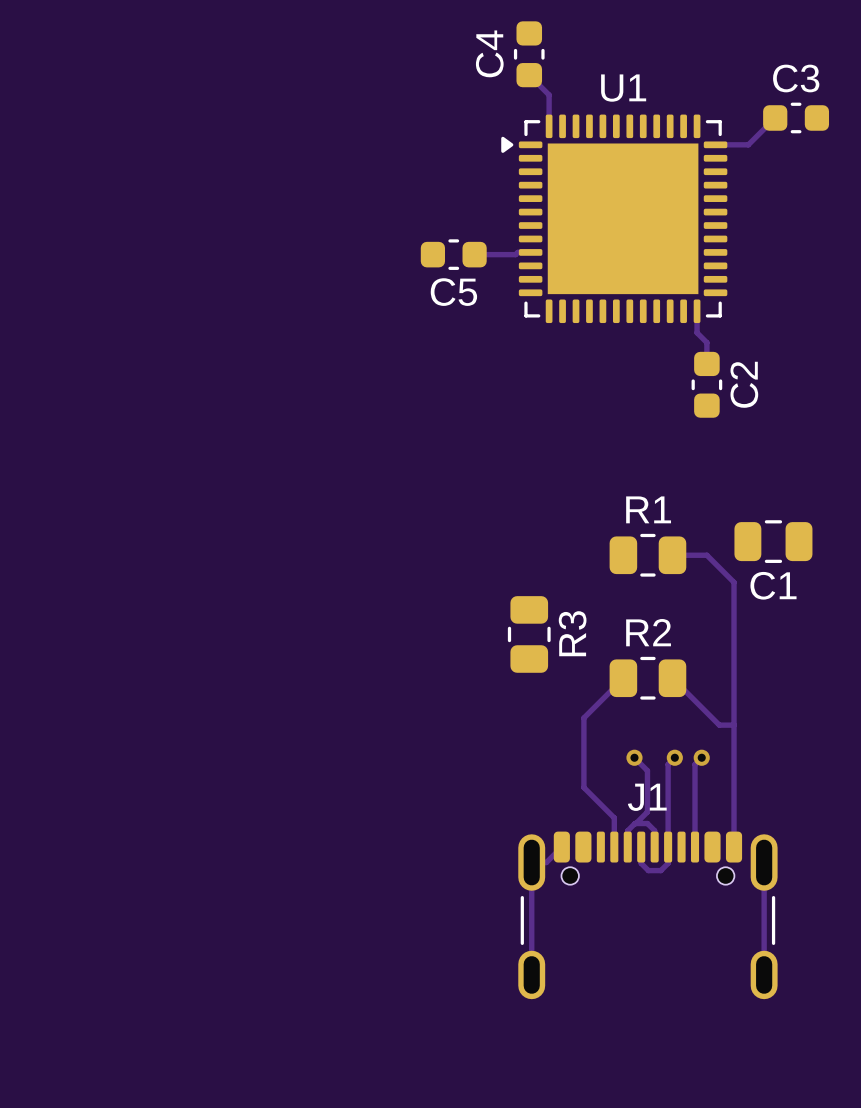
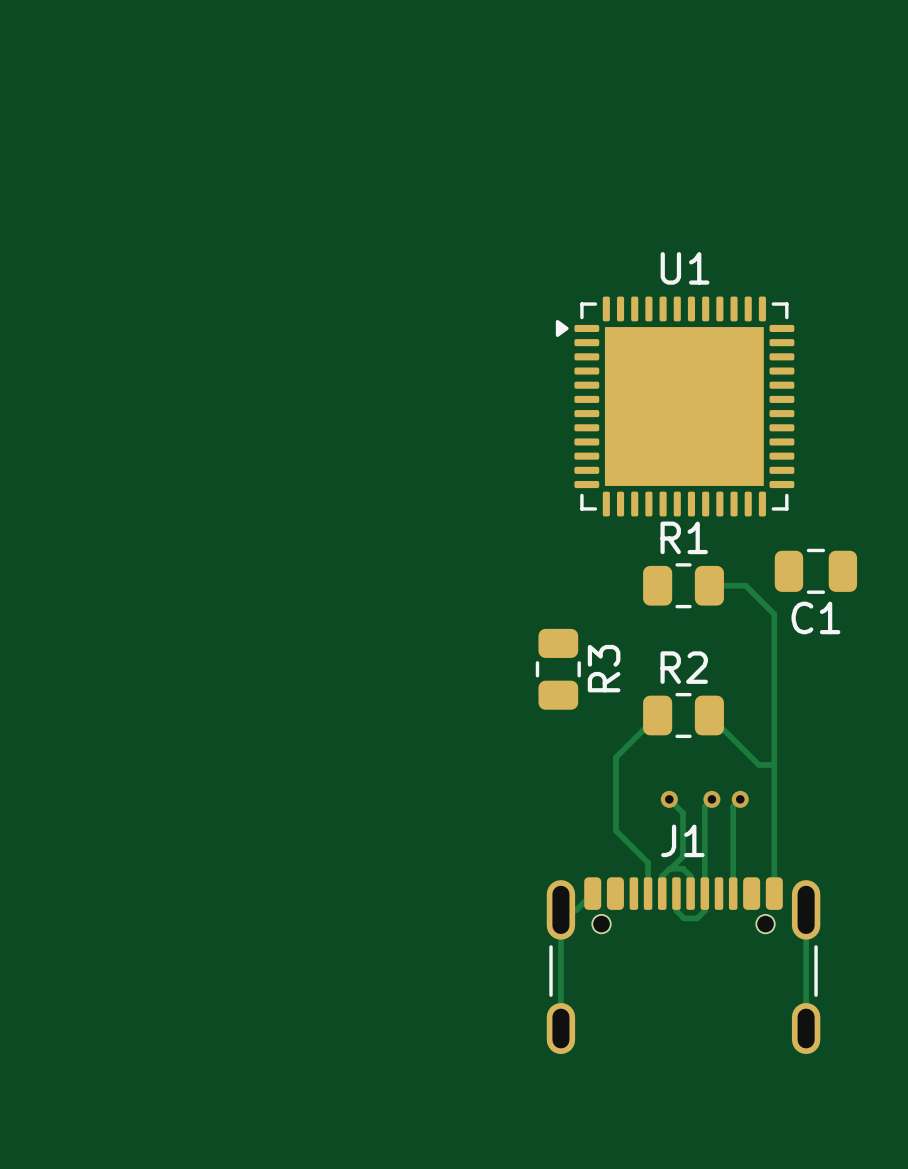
C4: (529, 54) -> none
track: (529, 75) (549, 94) (549, 126) -> none
track: (775, 117) (748, 144) (715, 144) -> none
C3: (796, 117) -> none
U1 position: (614, 218) -> (675, 406)
track: (530, 252) (517, 252) (515, 254) (474, 254) -> none
C5: (453, 254) -> none
track: (697, 311) (697, 332) (706, 342) (706, 363) -> none
C2: (706, 384) -> none

